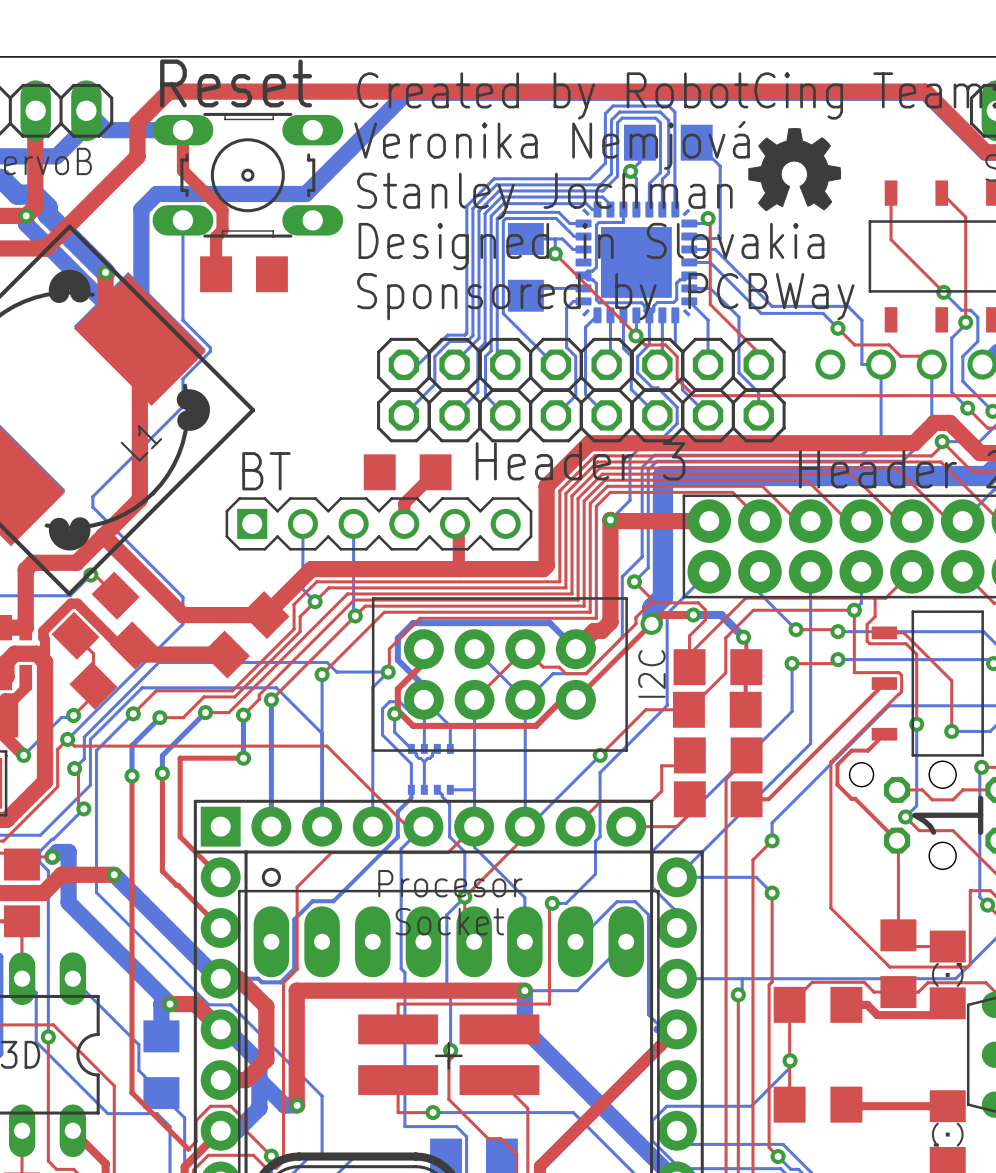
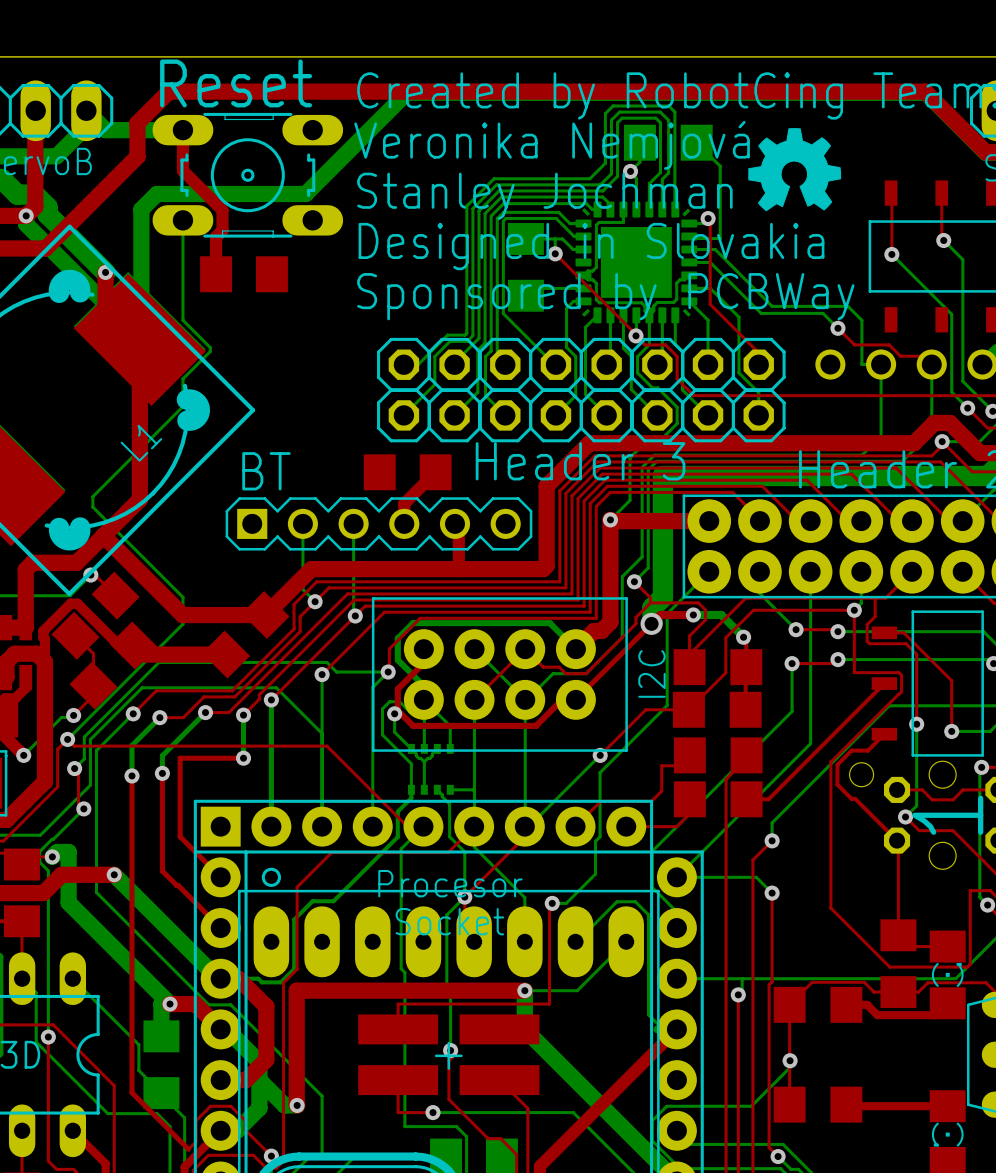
top track: (891, 193) (891, 239) (943, 292) -> (891, 193) (891, 254)
top track: (941, 193) (965, 217) (965, 322) -> (941, 193) (941, 238) (943, 240)
via: none -> (943, 240)
via: none -> (891, 254)
bottom track: (943, 292) (961, 310) (970, 310) (977, 317) (977, 341) (962, 356) -> (943, 240) (962, 259) (962, 356)
via: (943, 292) -> none
bottom track: (965, 322) (951, 338) -> (891, 254) (951, 314) (951, 338)
via: (965, 322) -> none

